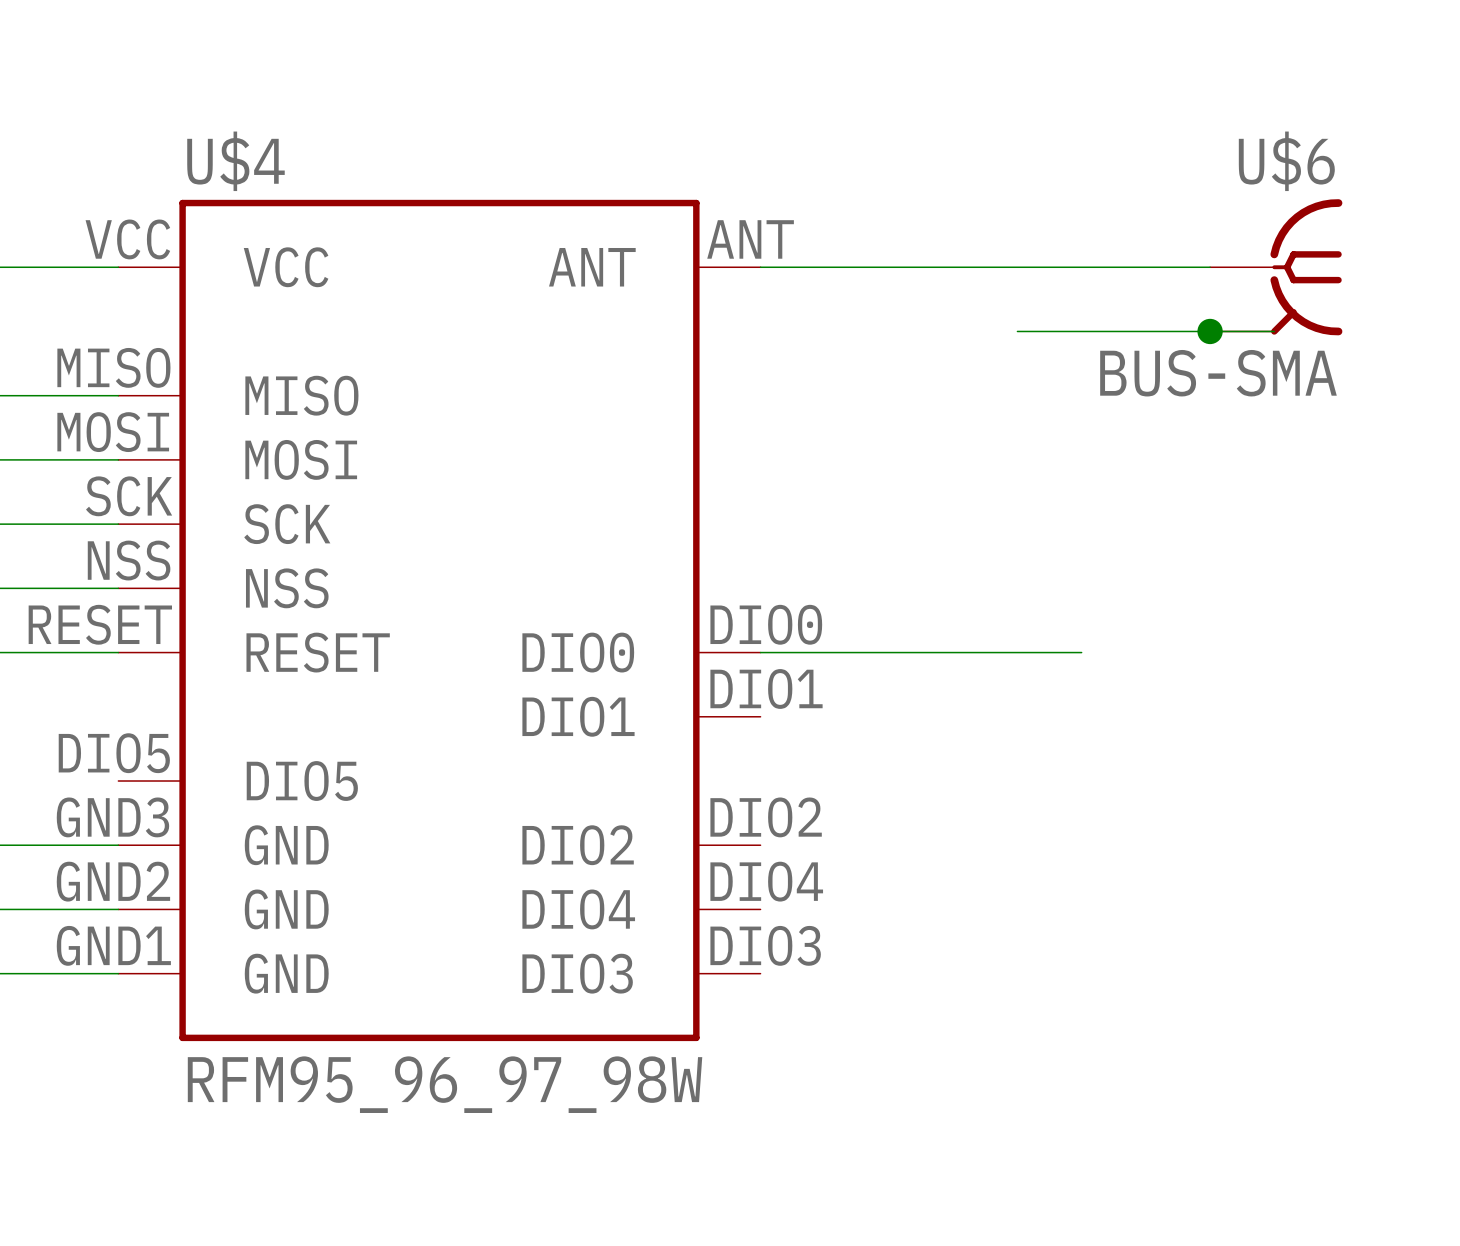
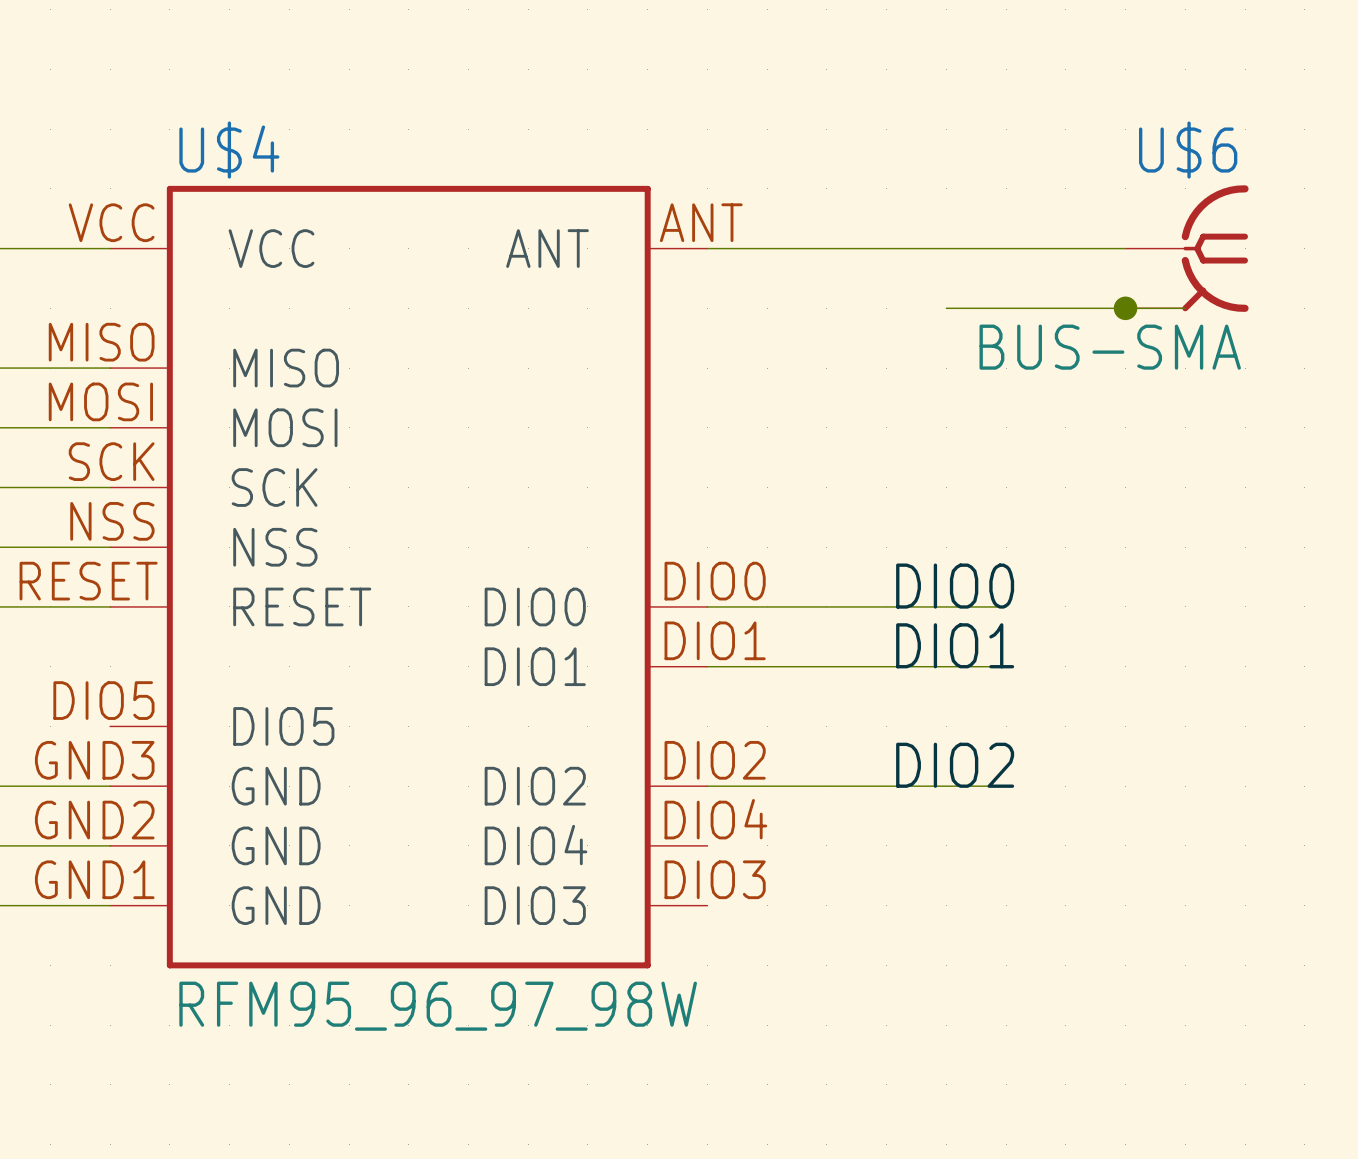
label: none -> DIO0 (955, 586)
label: none -> DIO1 (955, 645)
wire: none -> (707, 666) (1006, 666)
label: none -> DIO2 (955, 765)
wire: none -> (707, 786) (1006, 786)

